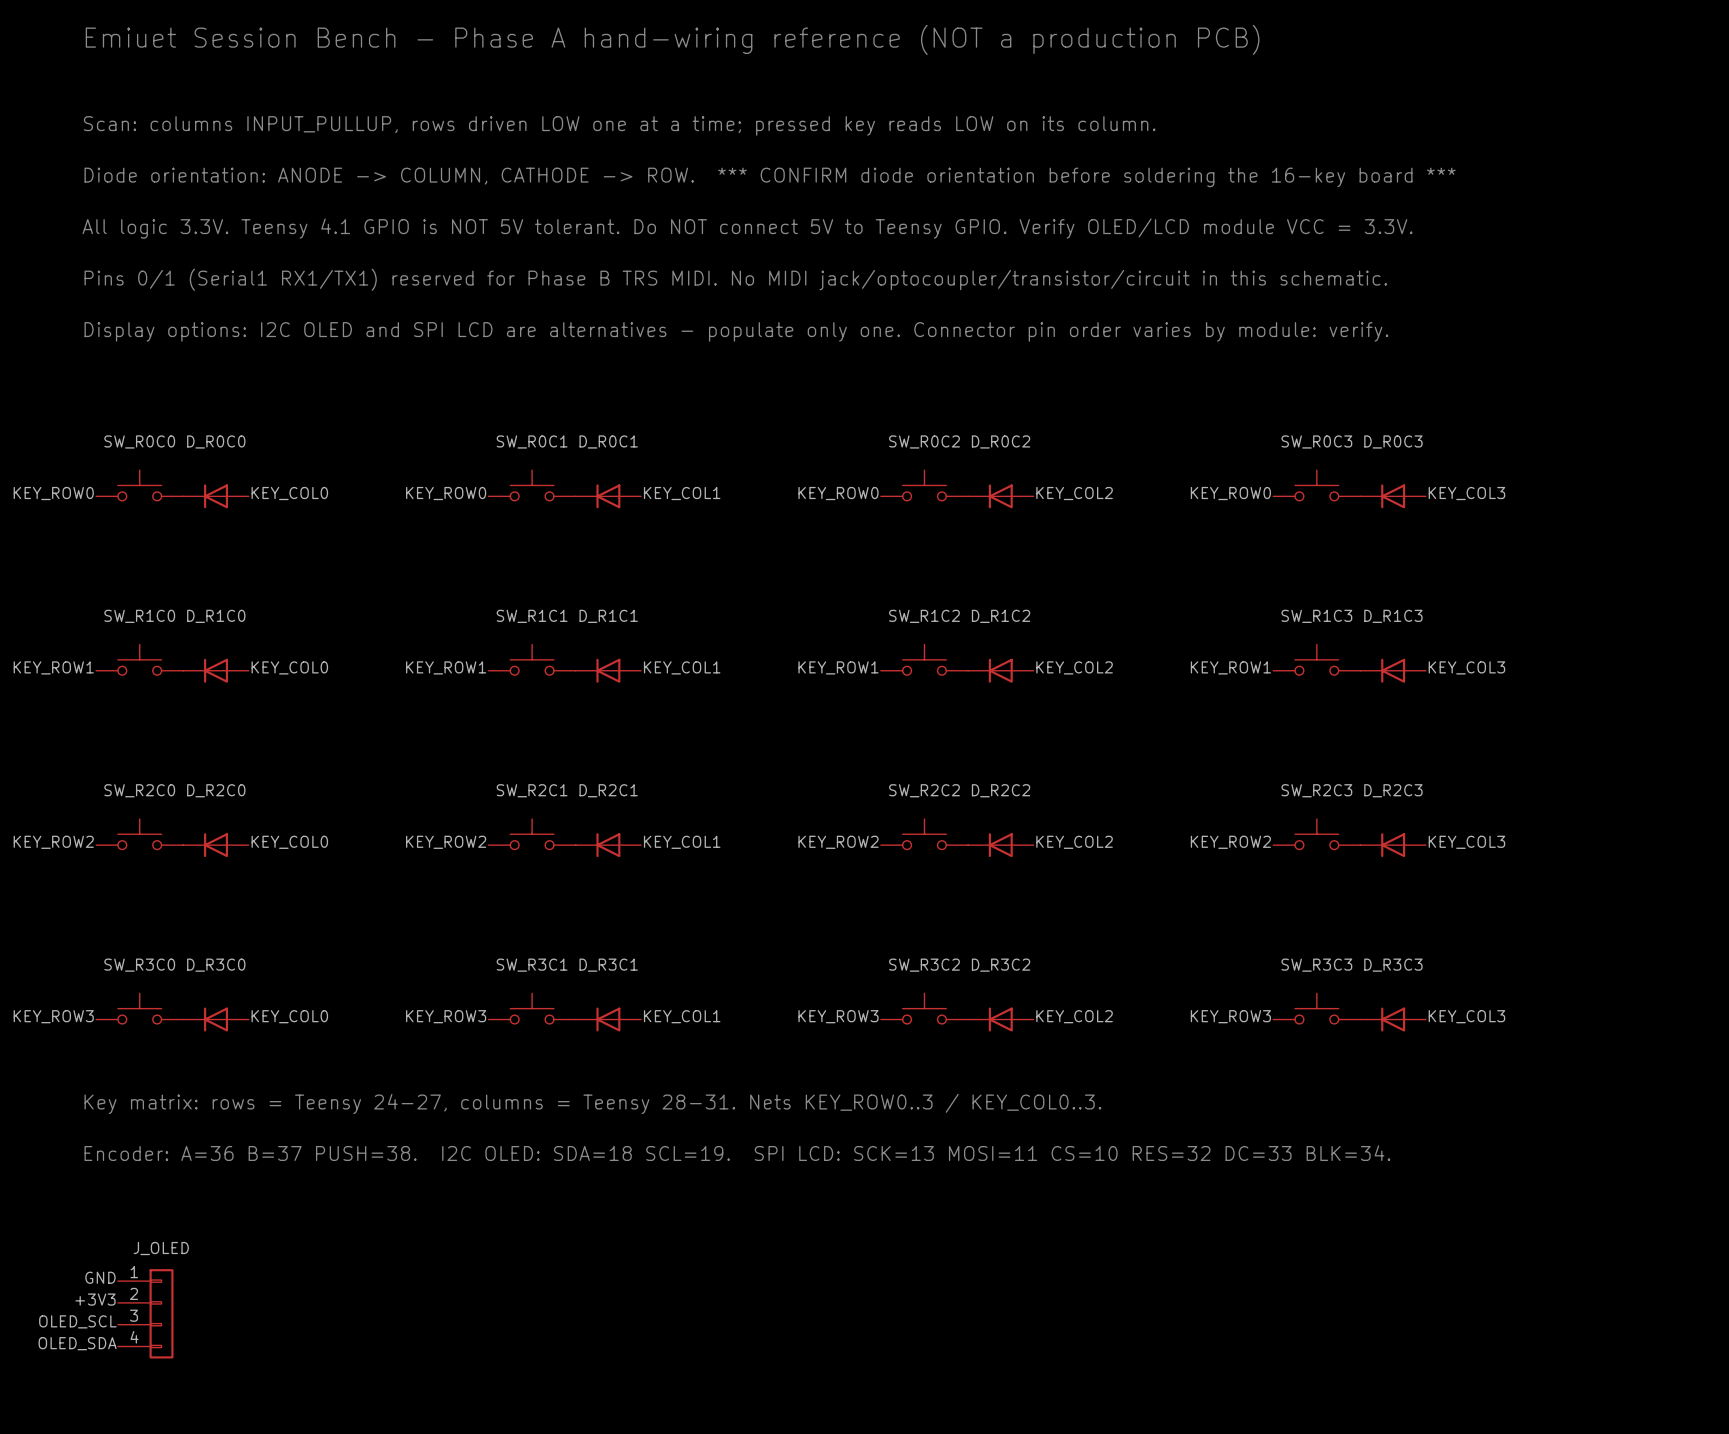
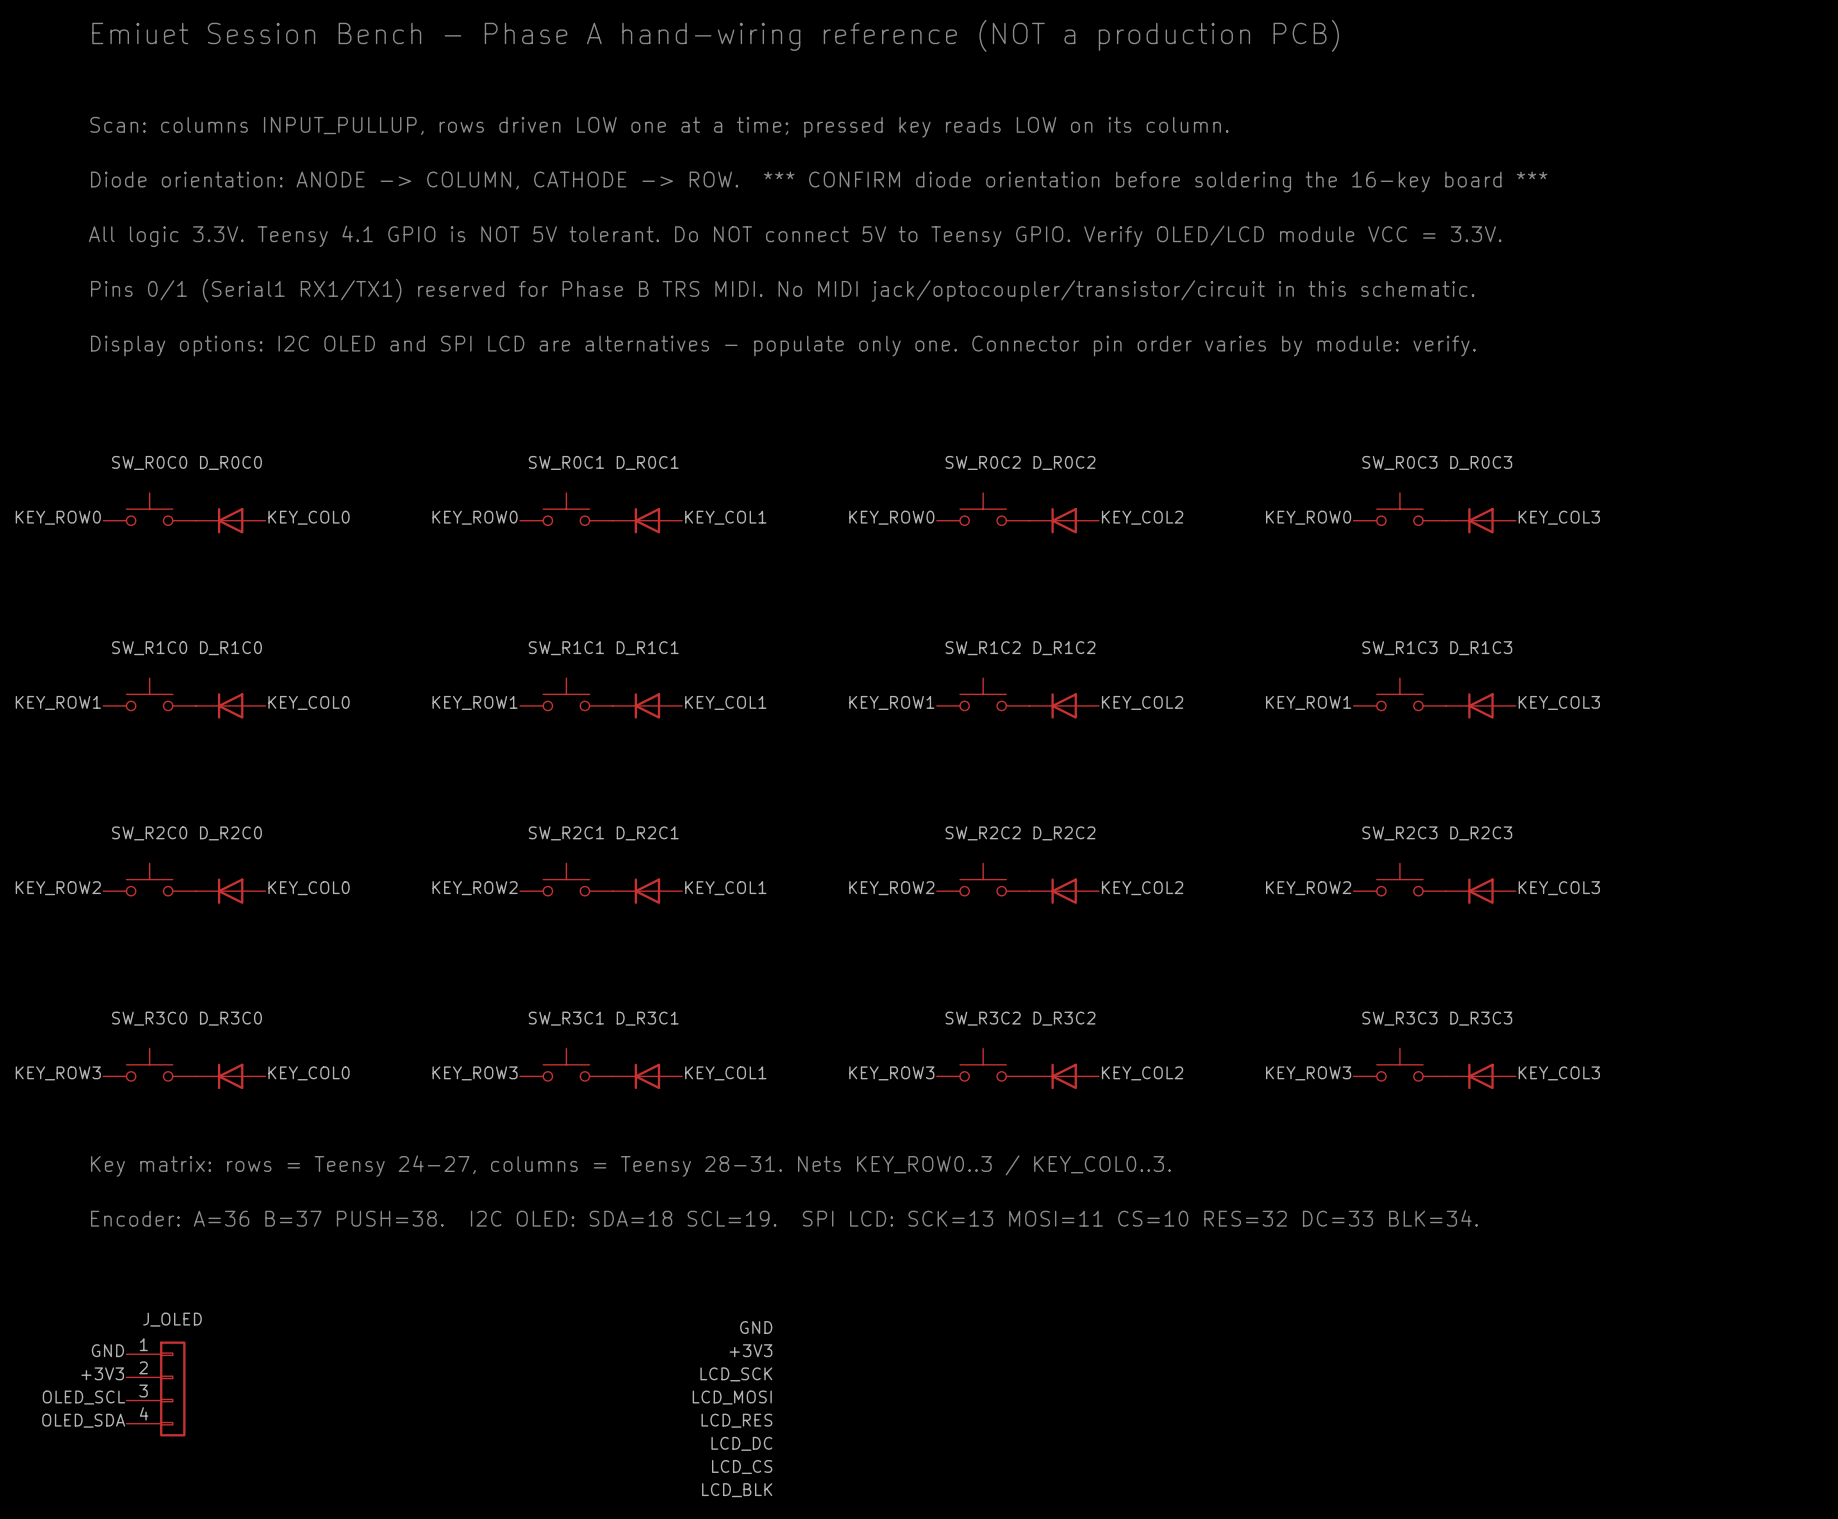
label: none -> GND (756, 1327)
label: none -> +3V3 (750, 1350)
label: none -> LCD_SCK (736, 1374)
label: none -> LCD_MOSI (732, 1397)
label: none -> LCD_RES (736, 1420)
label: none -> LCD_DC (741, 1443)
label: none -> LCD_CS (742, 1467)
label: none -> LCD_BLK (737, 1490)

